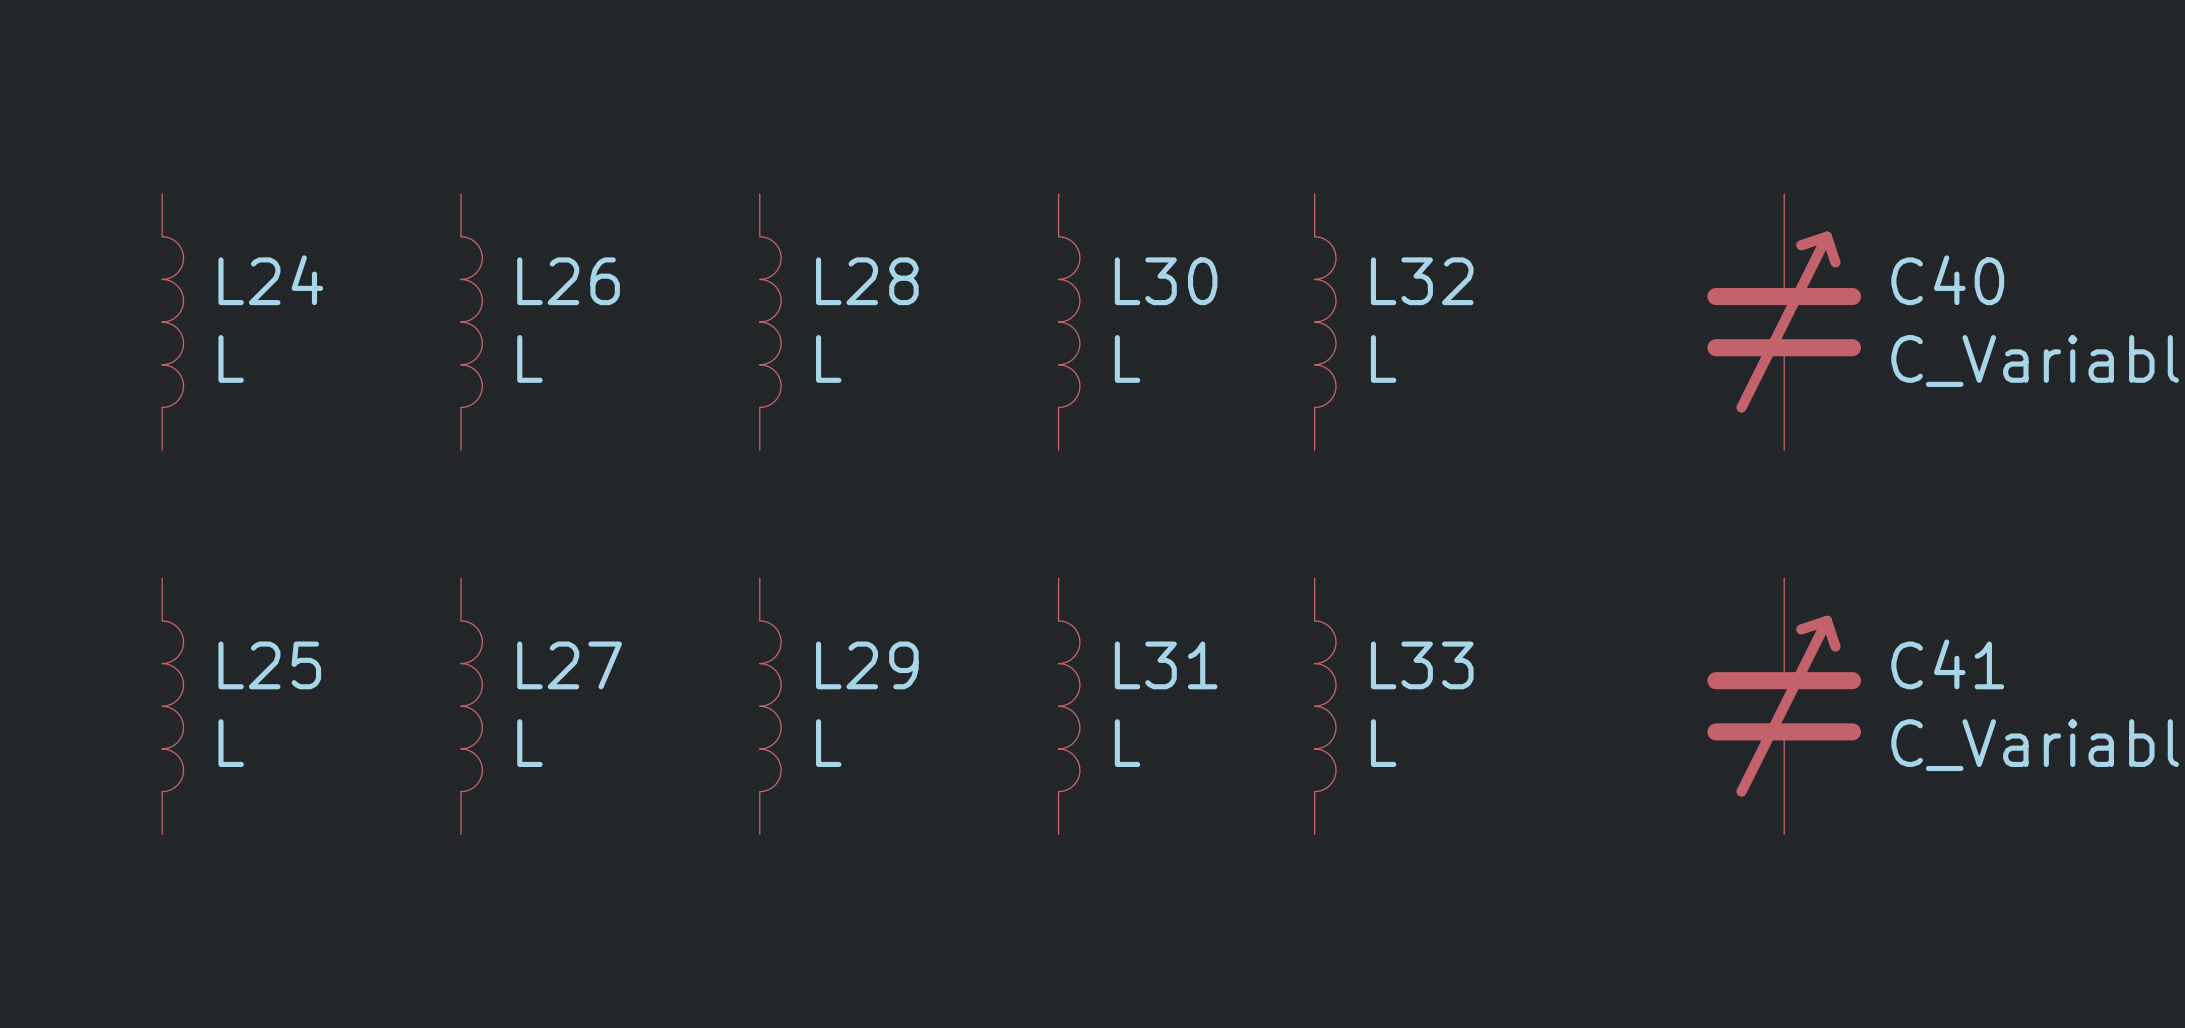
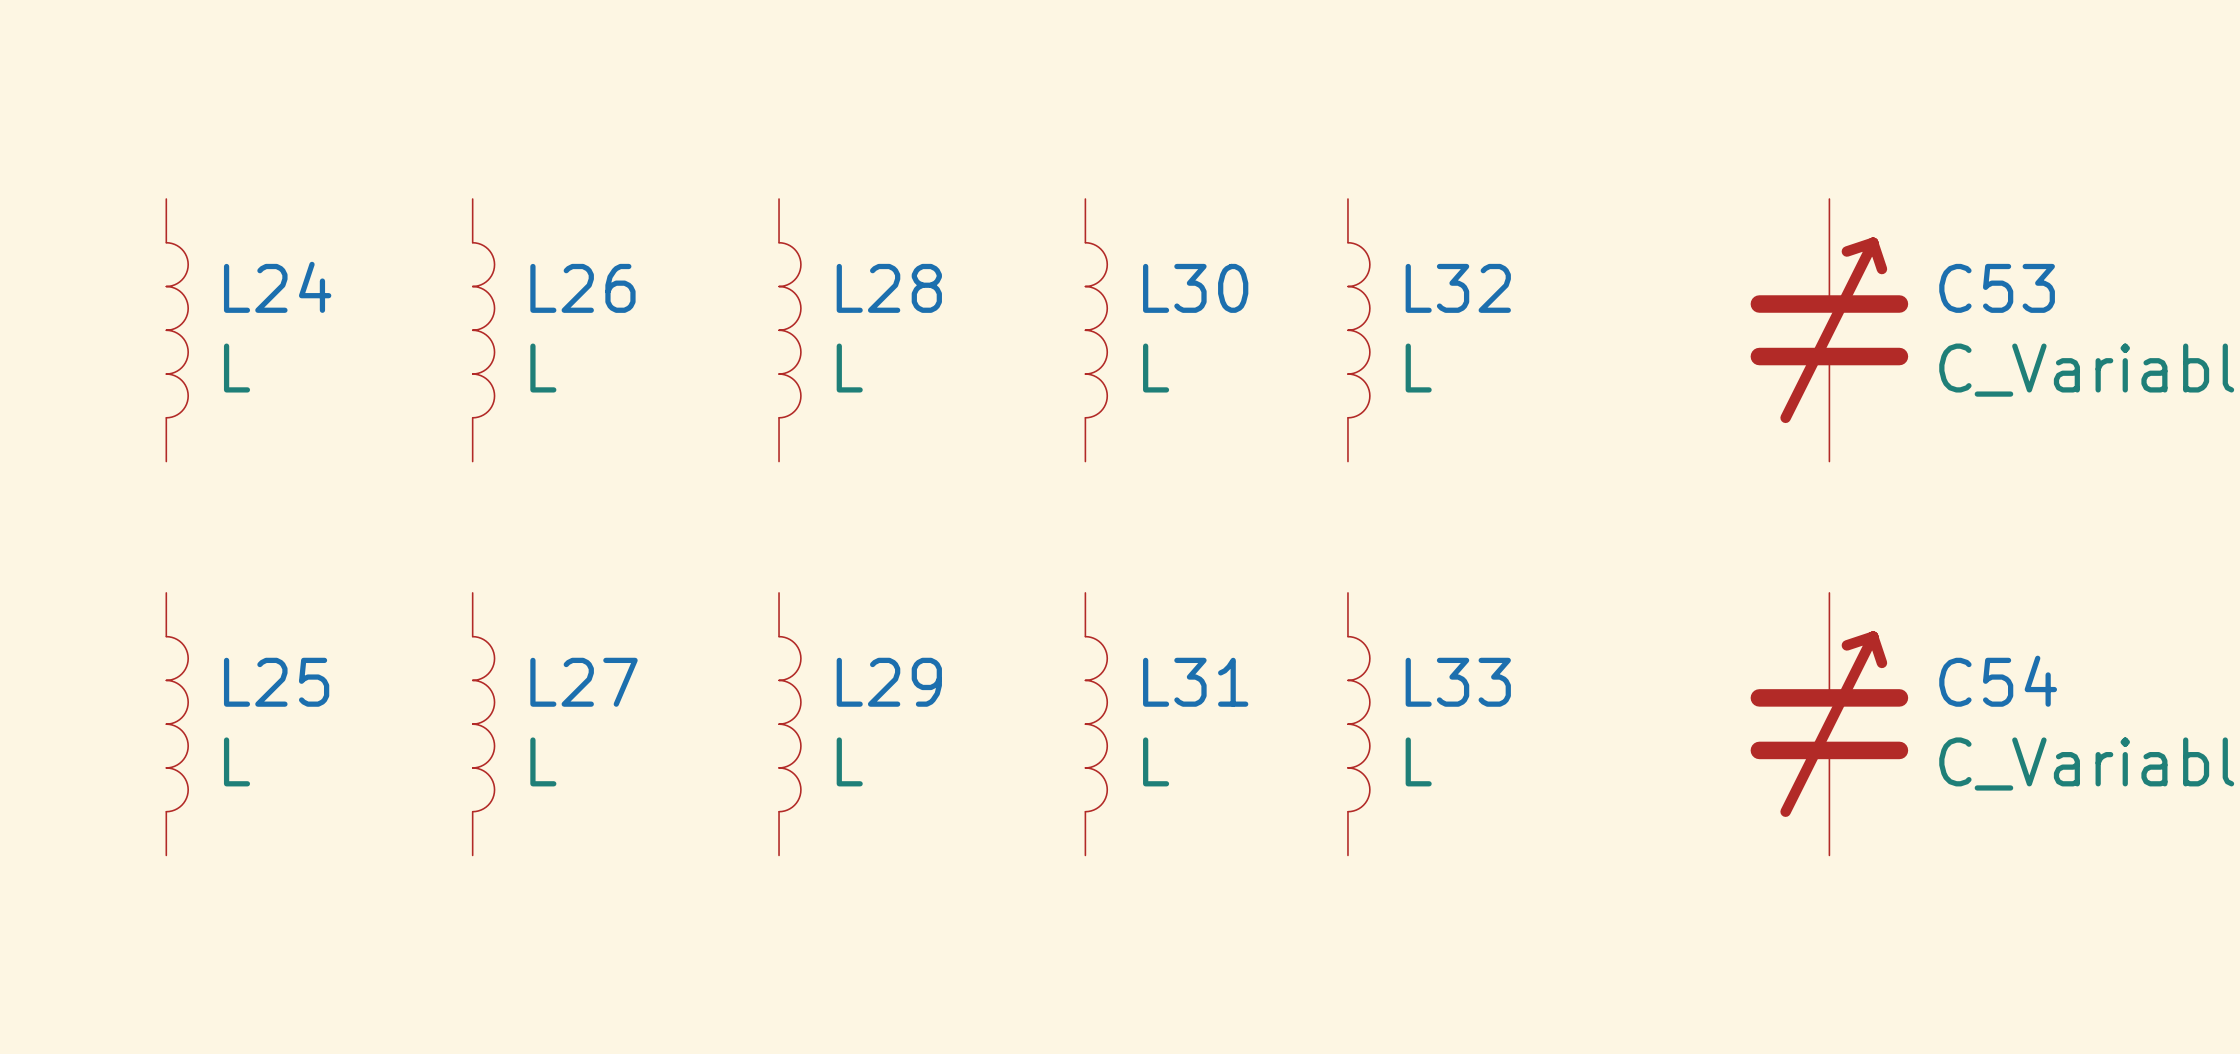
C40 name: C40 (1947, 280) -> C53 (1997, 288)
C41 name: C41 (1947, 664) -> C54 (1998, 681)

